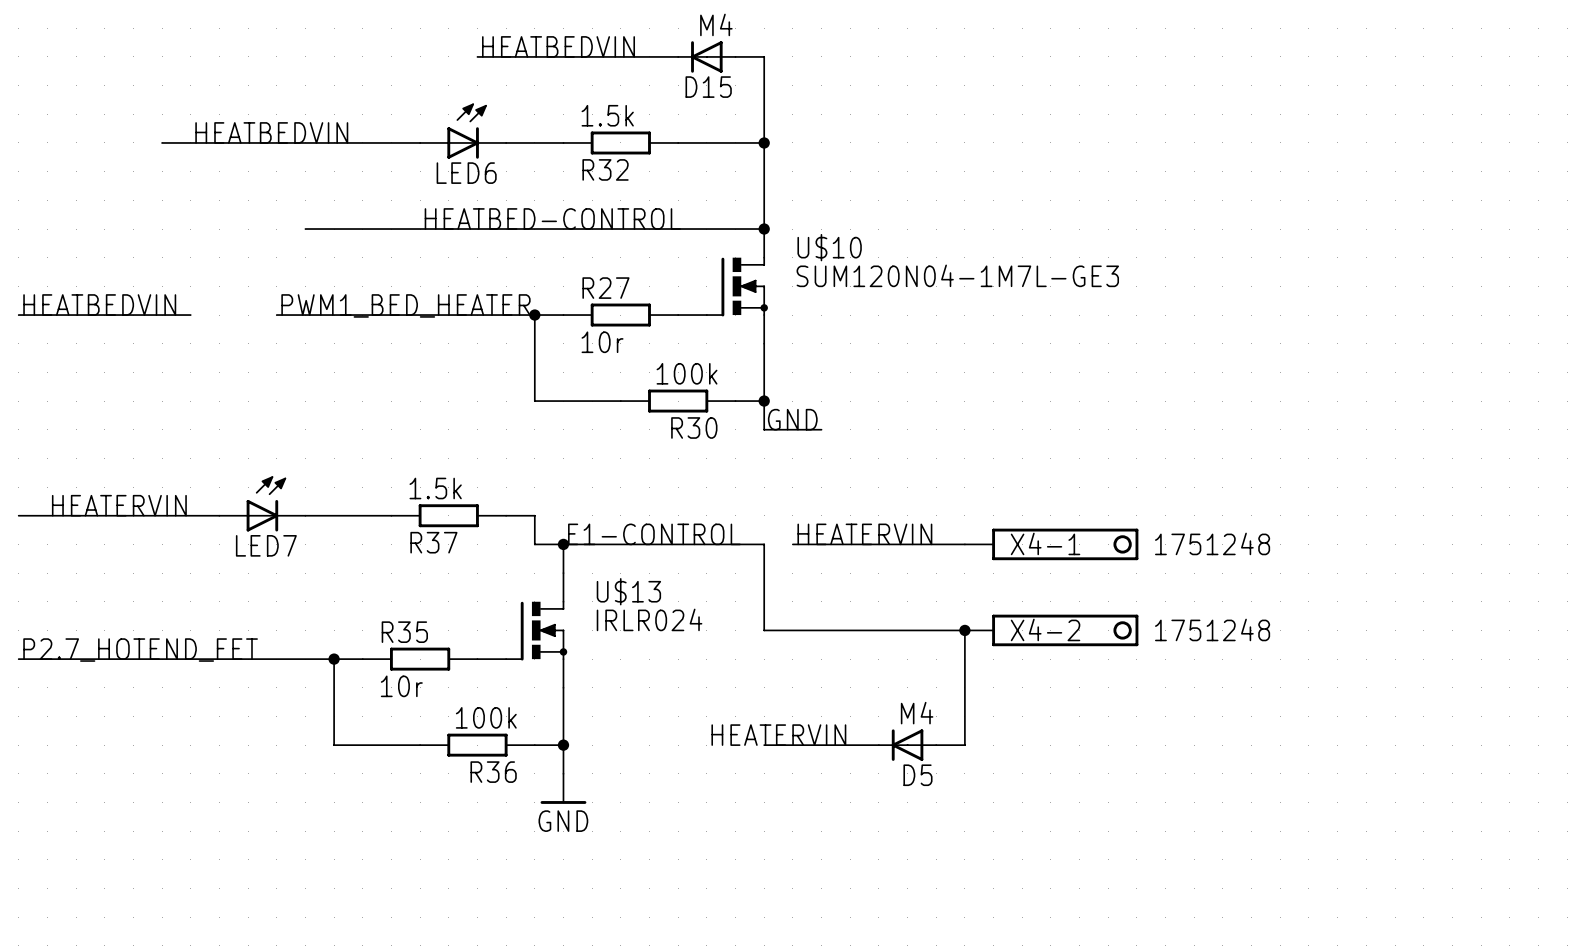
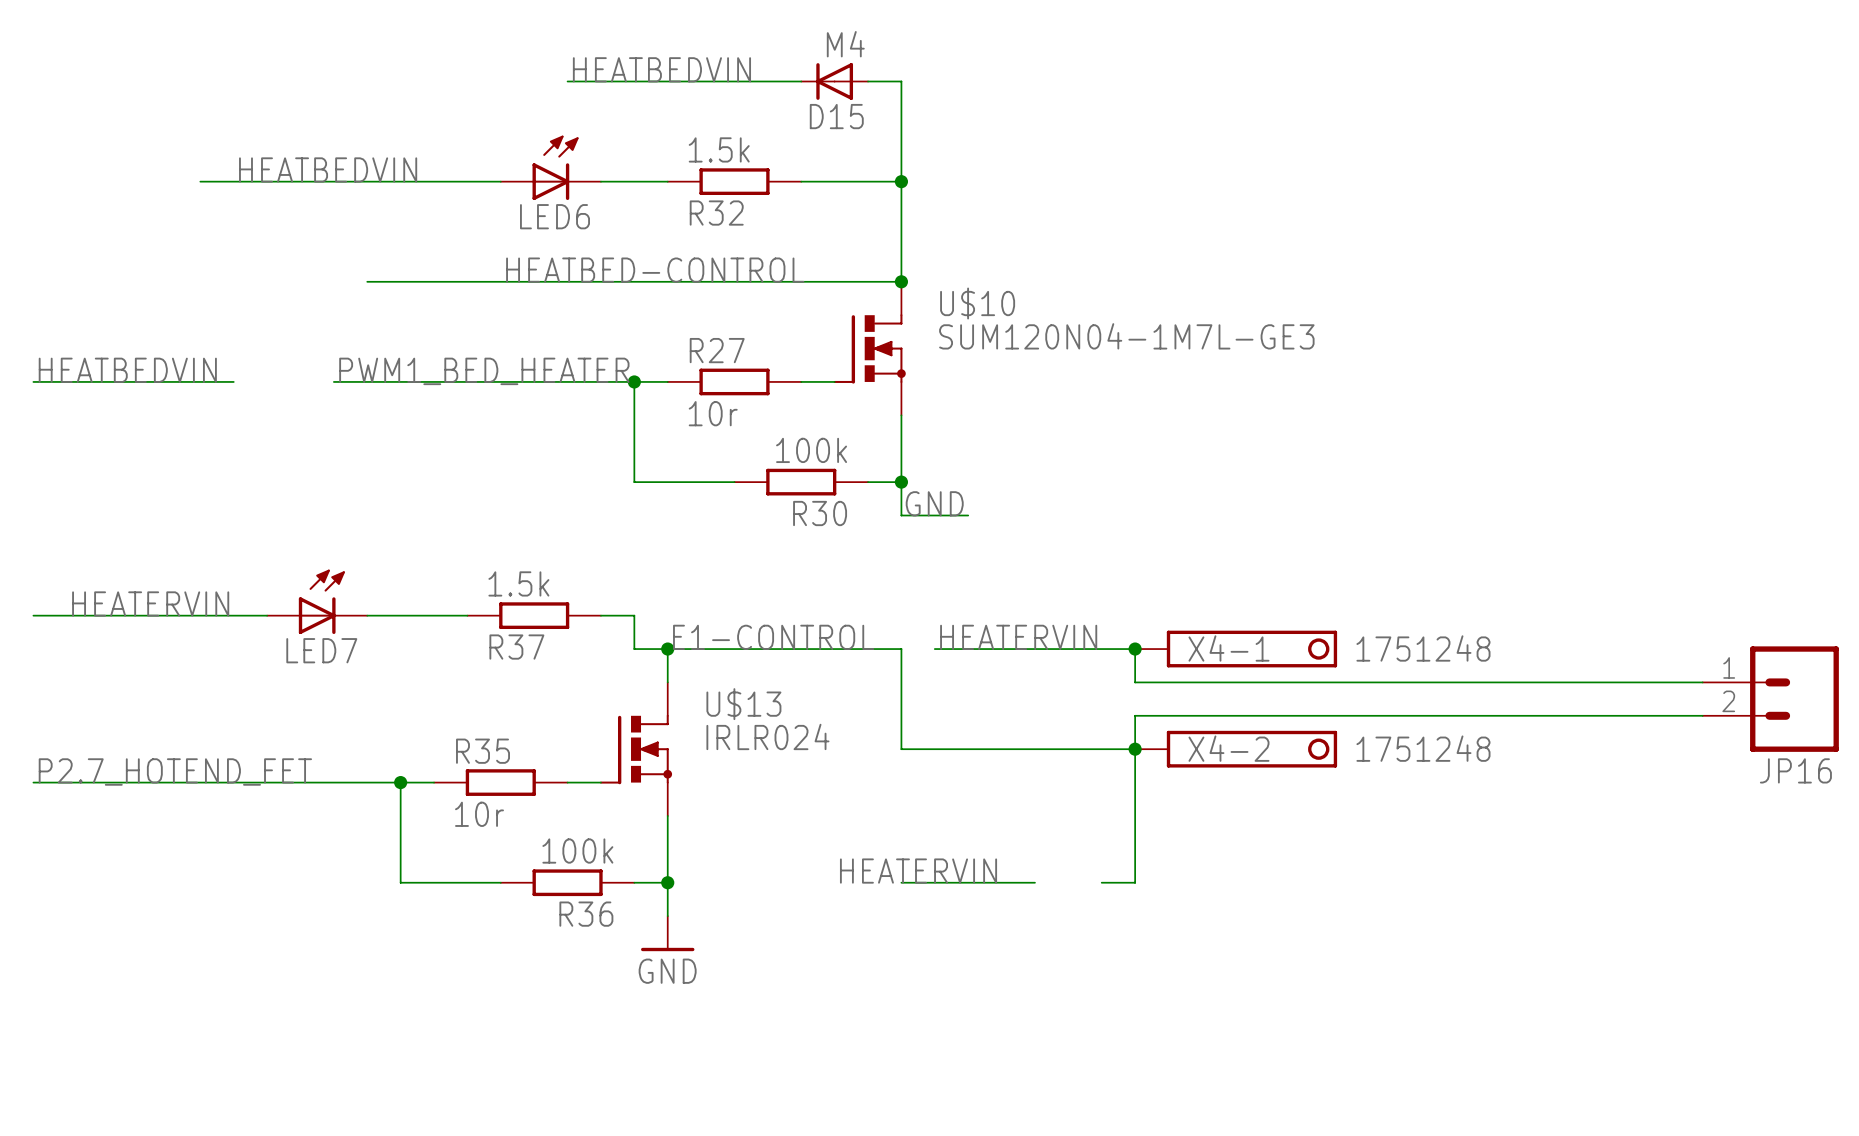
wire: none -> (1135, 649) (1135, 682) (1702, 682)
junction: none -> (1135, 649)
JP16: none -> (1770, 699)
wire: none -> (1702, 715) (1135, 715) (1135, 749)
D5: M4 (907, 745) -> none

